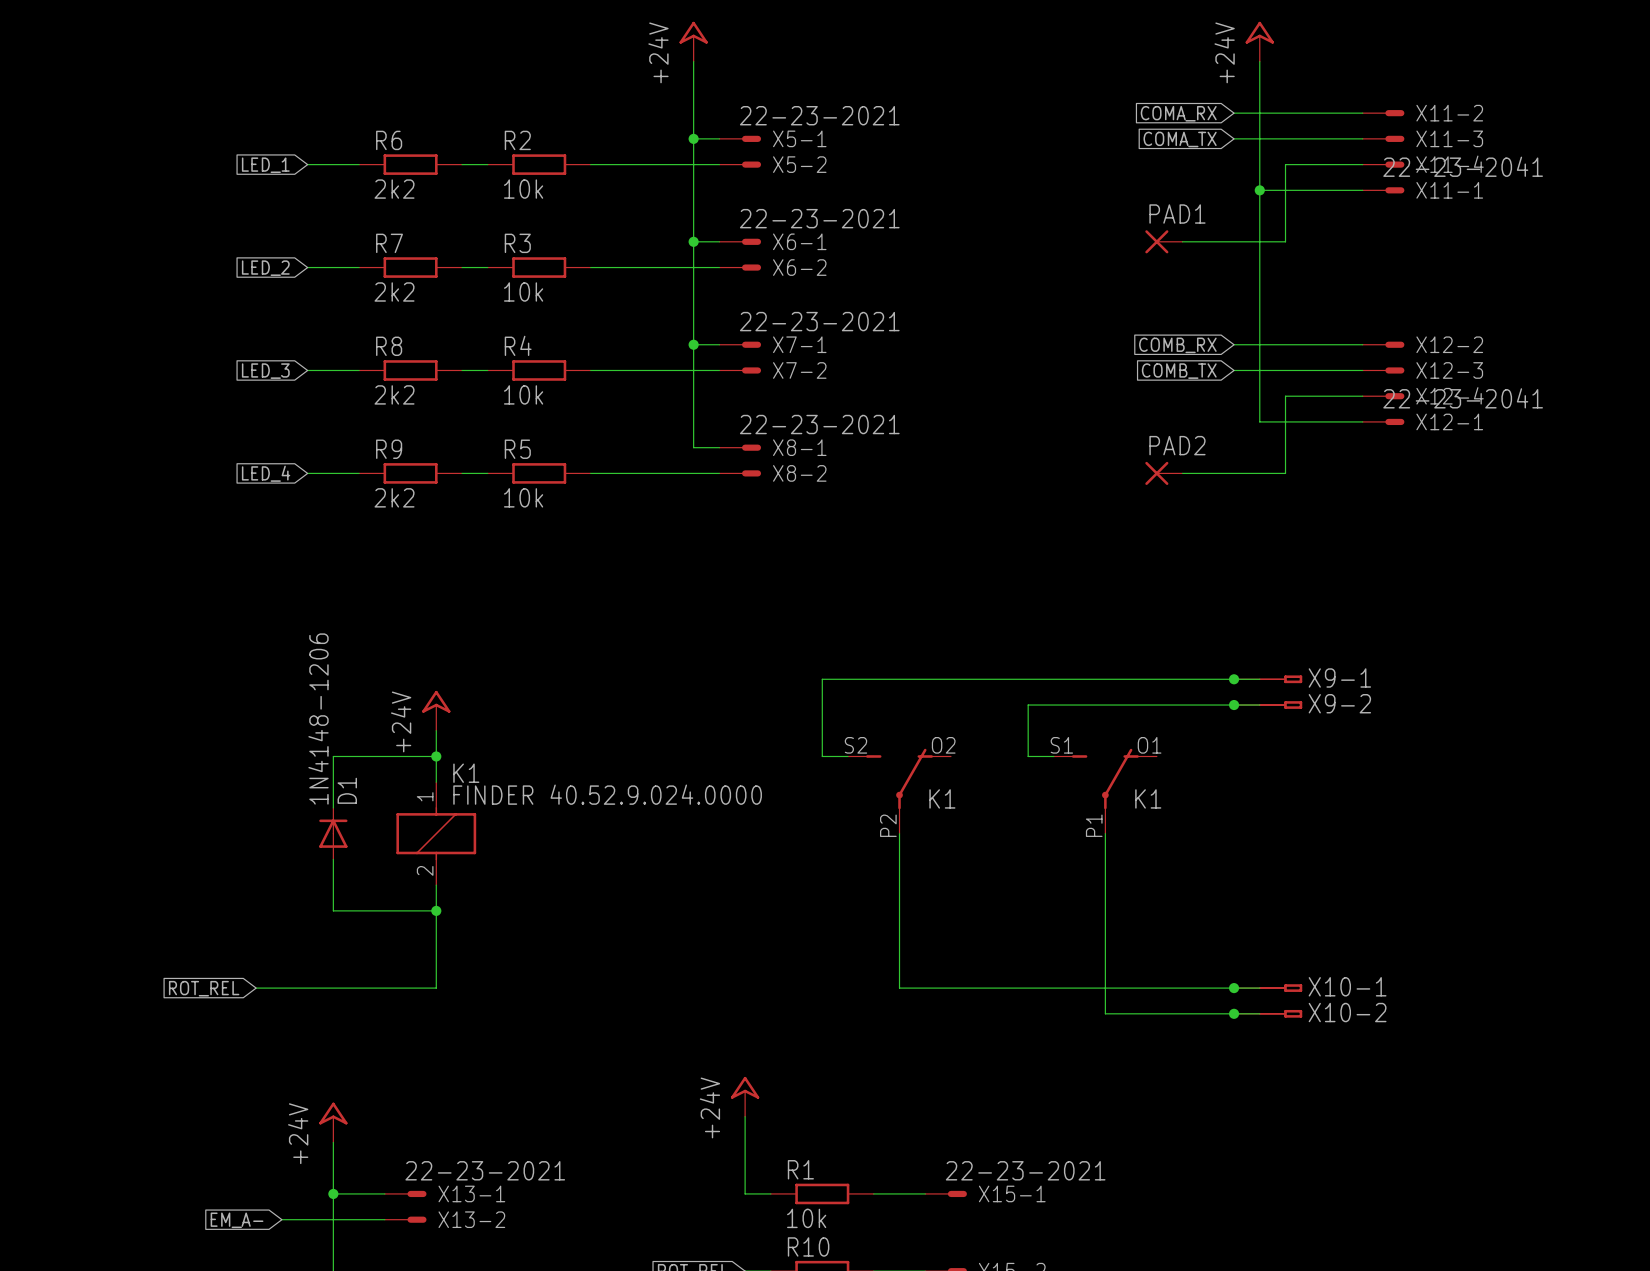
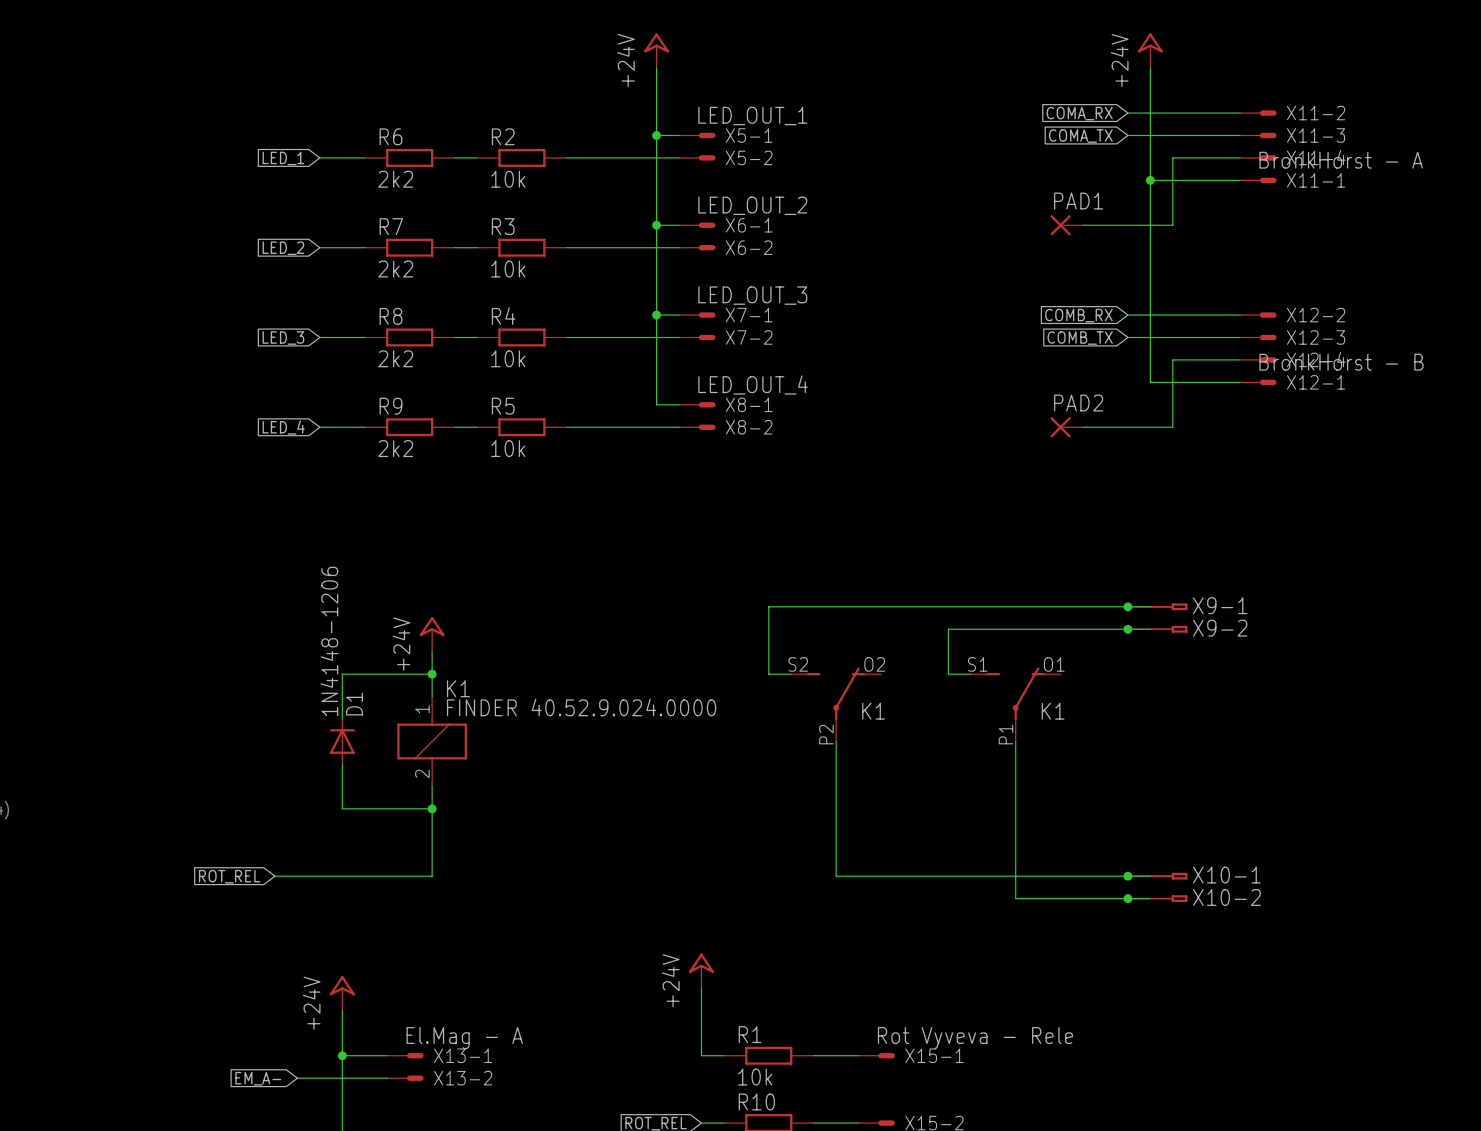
X5-1 value: 22-23-2021 (819, 115) -> LED_OUT_1 (752, 116)
X11-1 value: 22-23-2041 (1463, 166) -> BronkHorst - A (1341, 160)
X6-1 value: 22-23-2021 (819, 218) -> LED_OUT_2 (752, 205)
X7-1 value: 22-23-2021 (819, 321) -> LED_OUT_3 (752, 295)
X12-1 value: 22-23-2041 (1463, 398) -> BronkHorst - B (1341, 362)
X8-1 value: 22-23-2021 (819, 424) -> LED_OUT_4 (753, 384)
X13-1 value: 22-23-2021 (485, 1170) -> El.Mag - A (464, 1038)
X15-1 value: 22-23-2021 (1025, 1170) -> Rot Vyveva - Rele (975, 1038)

